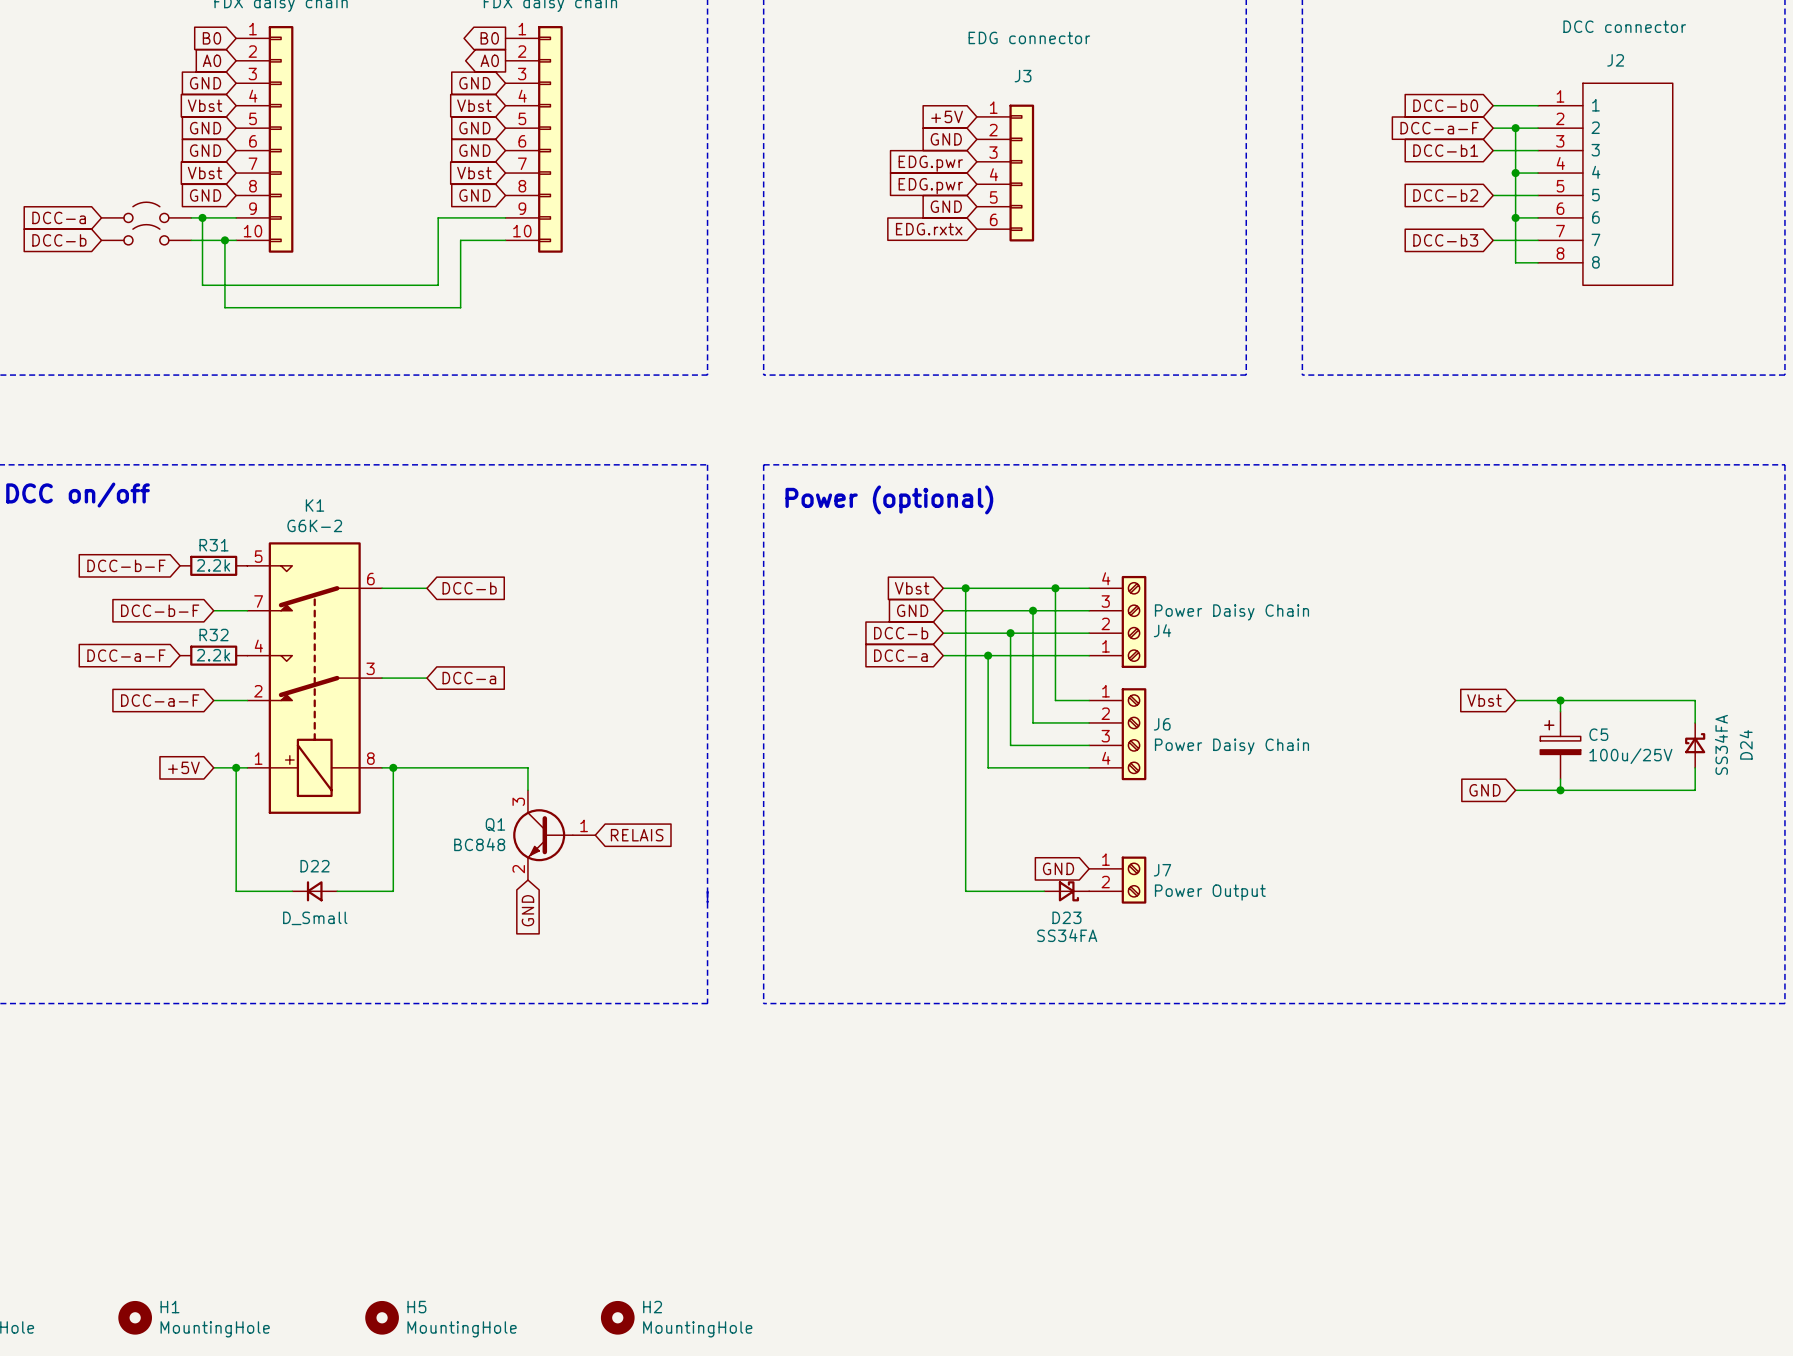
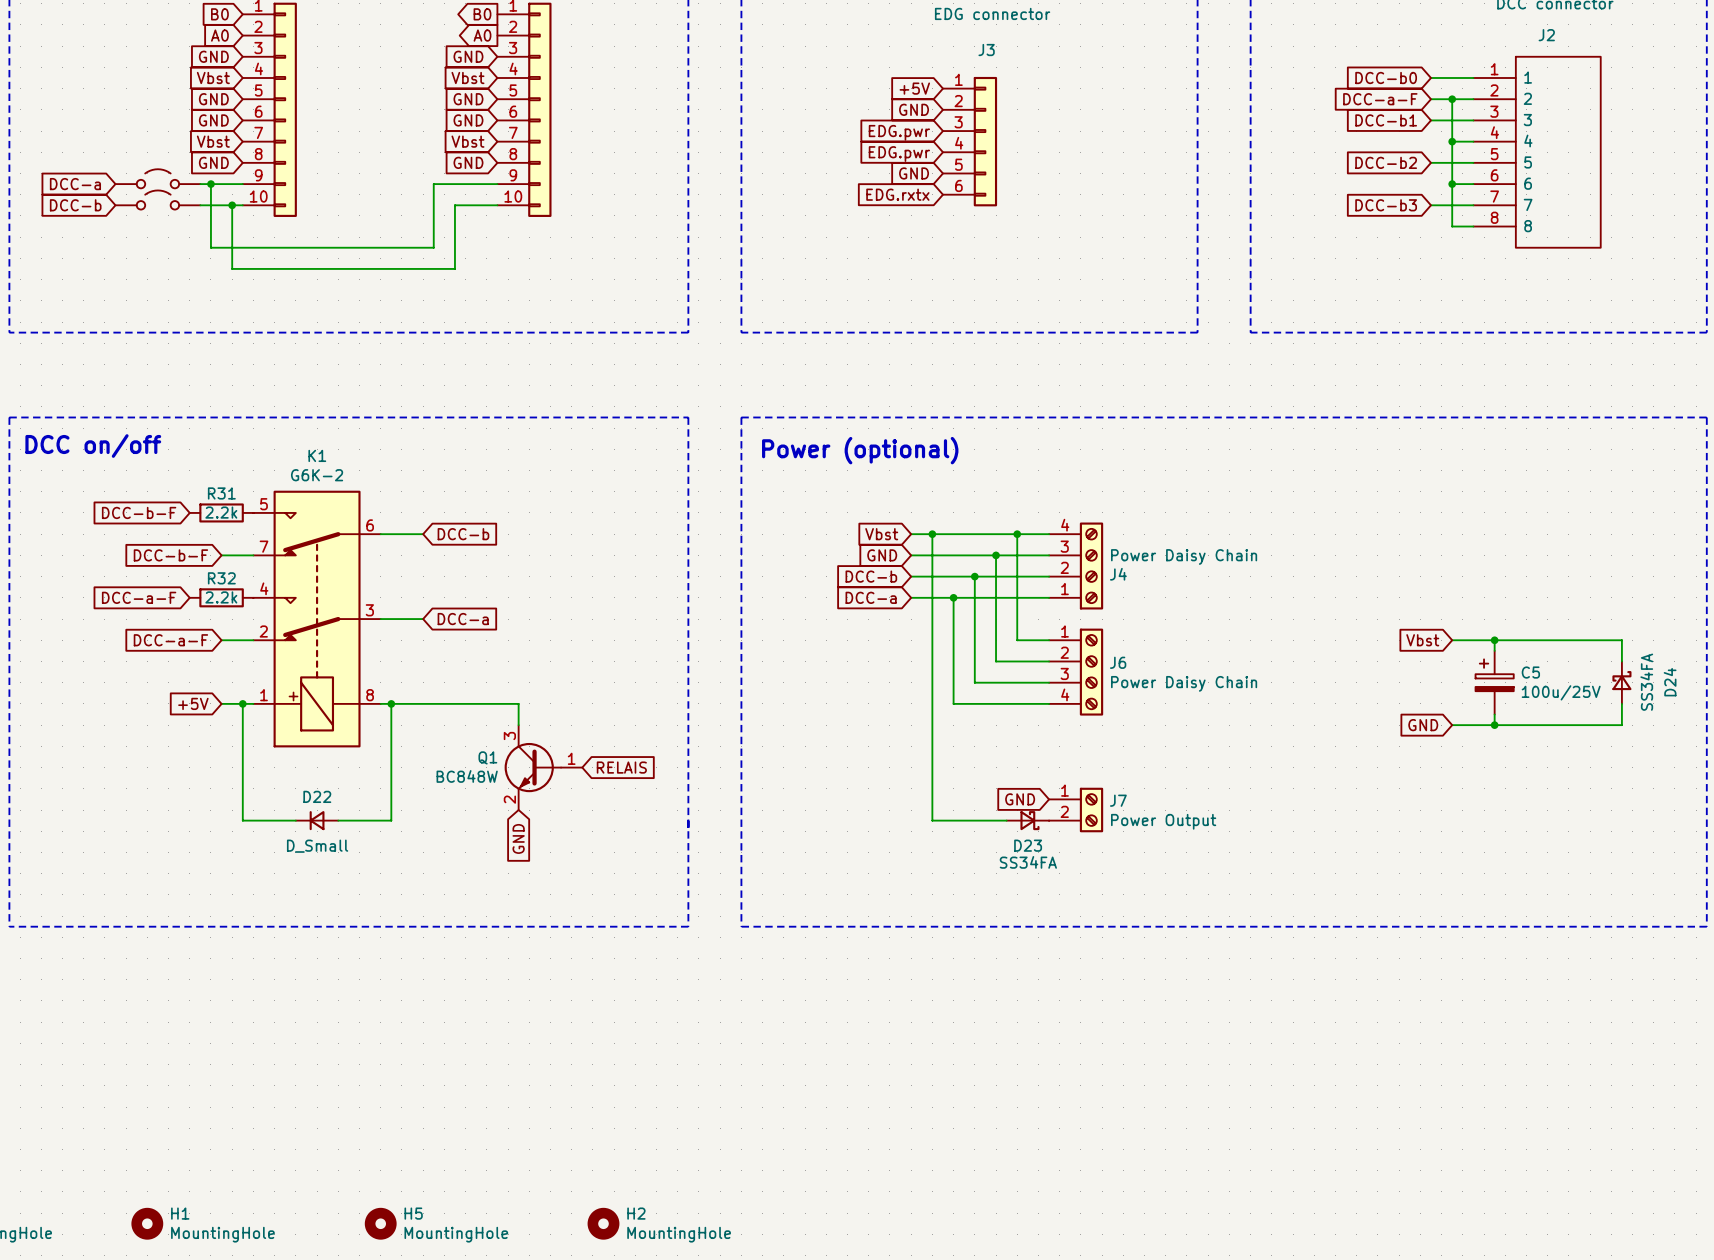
Q1 value: BC848 (479, 844) -> BC848W (467, 776)

